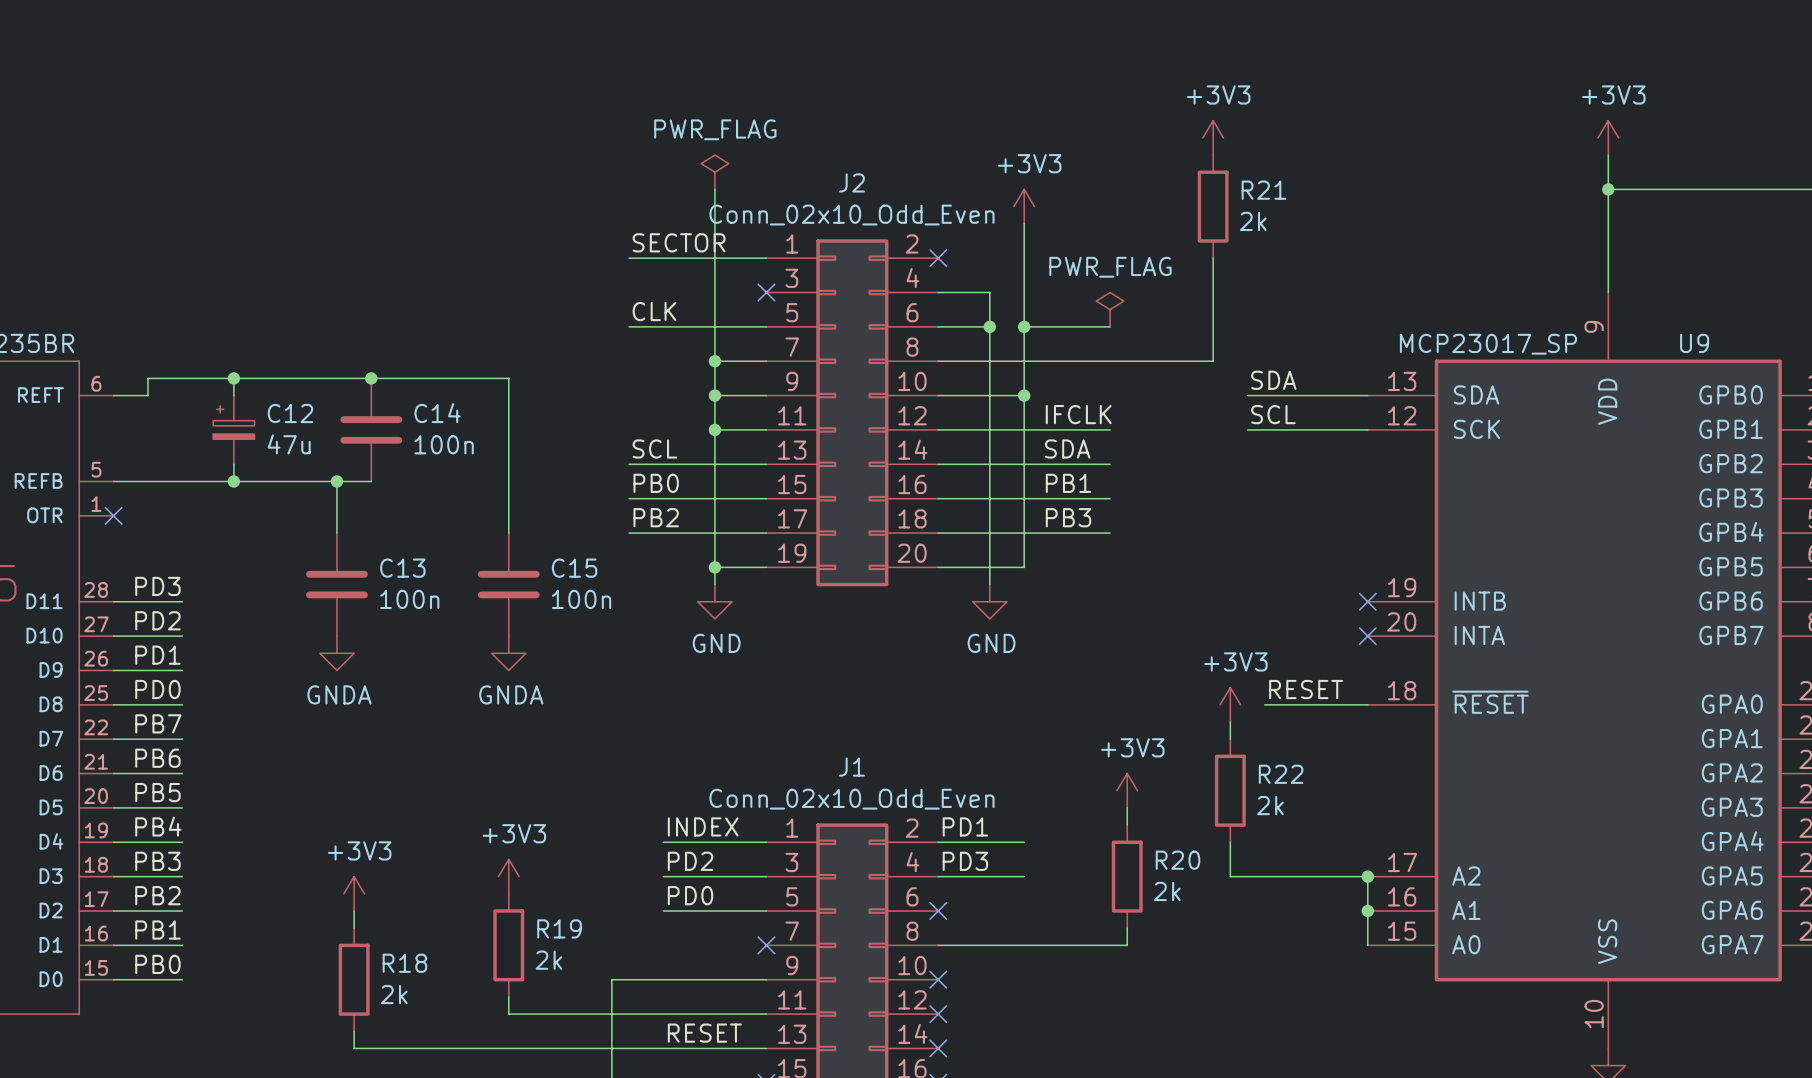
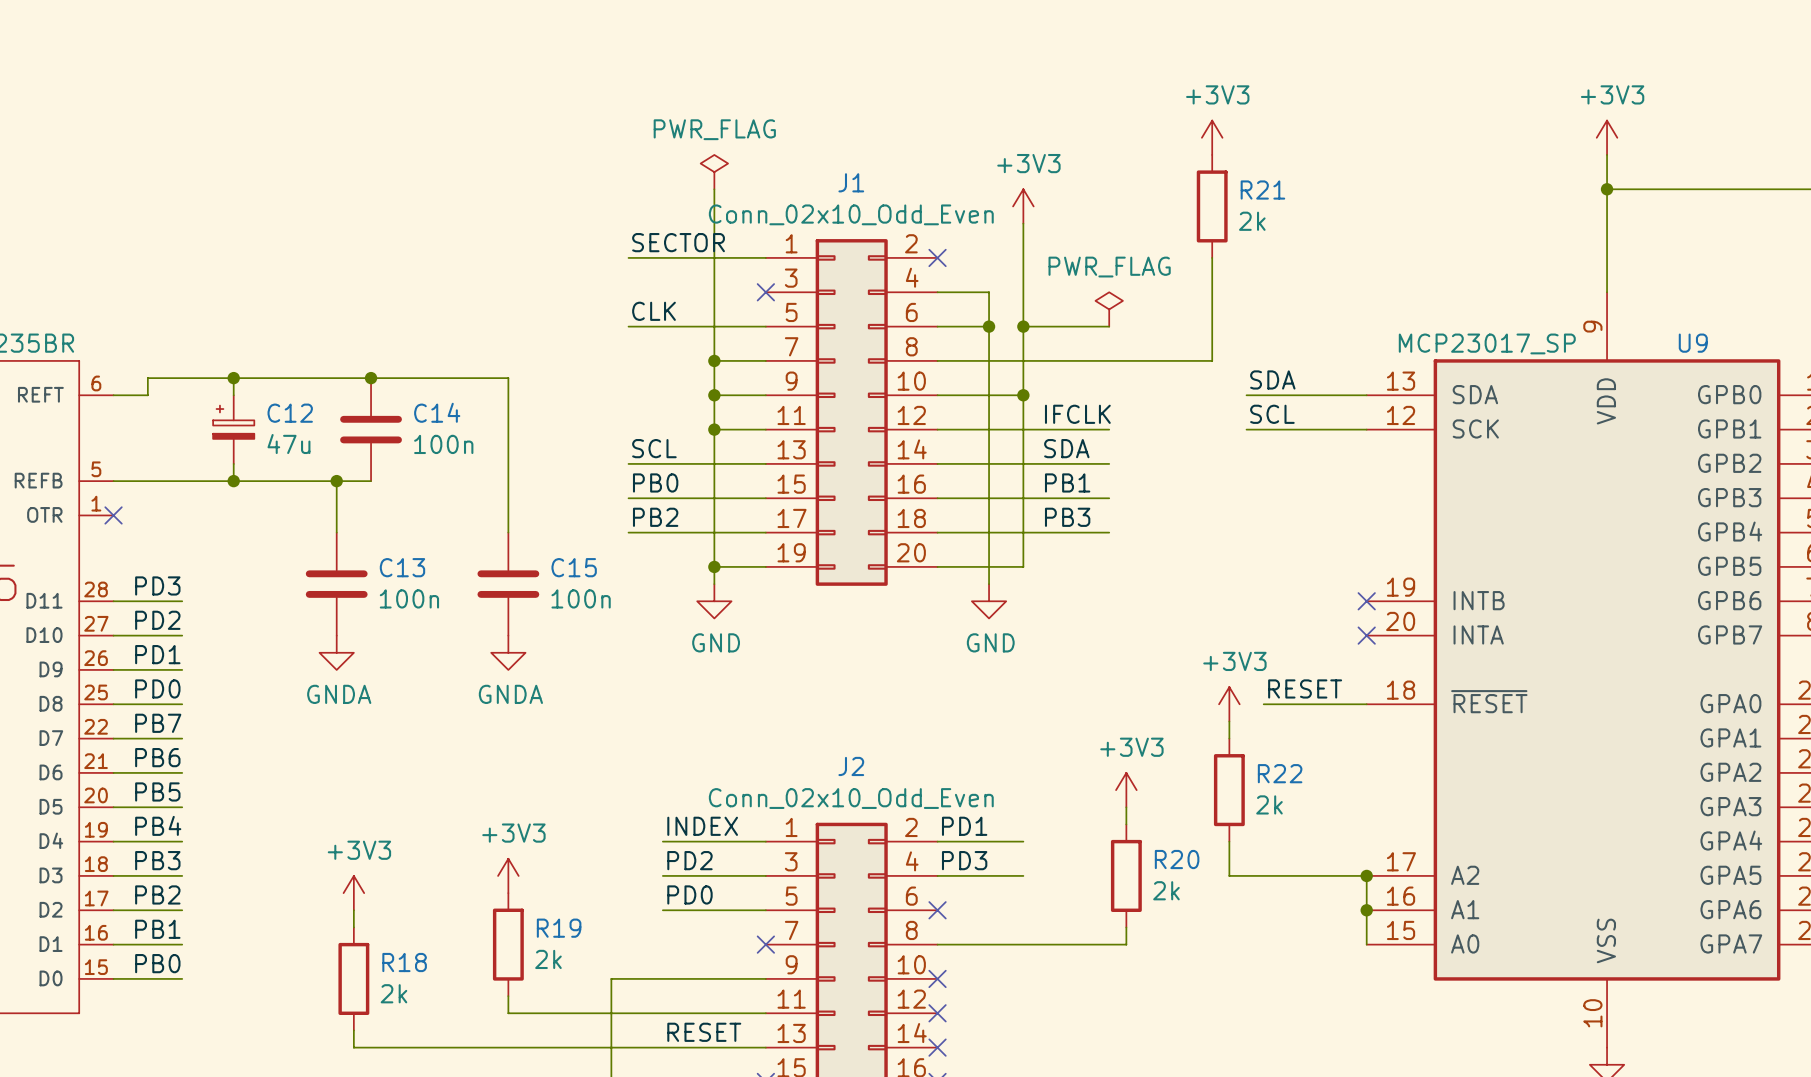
J2 name: J2 (851, 182) -> J1 (851, 182)
J1 name: J1 (851, 767) -> J2 (851, 766)

